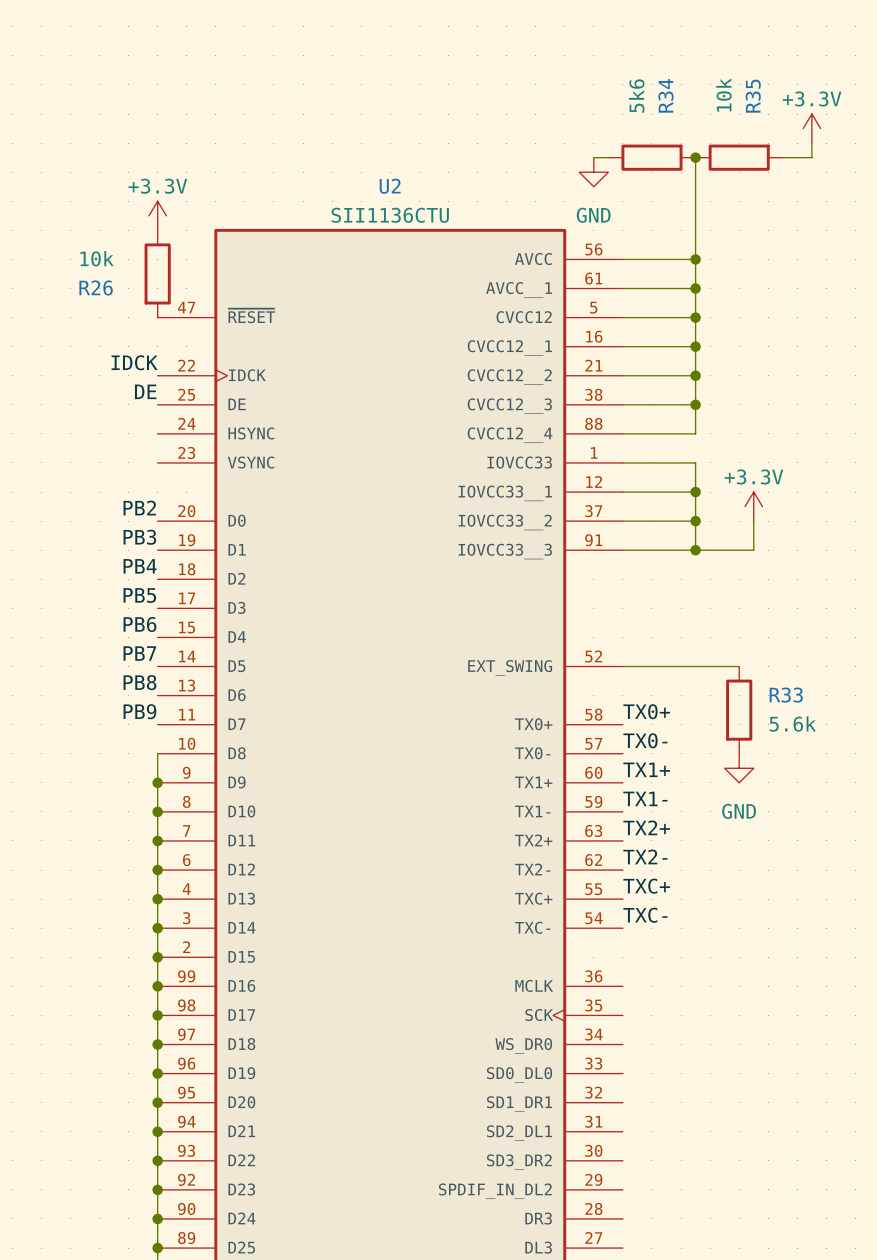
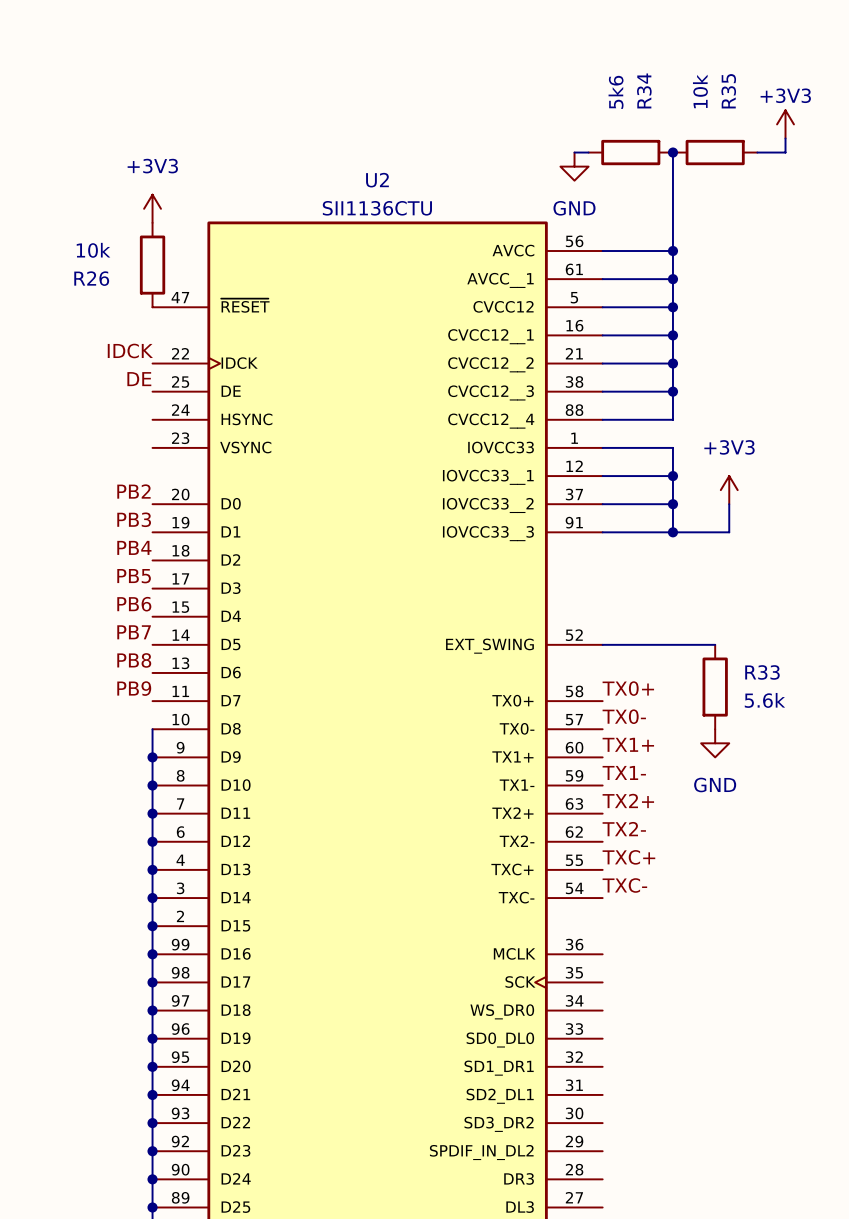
power symbol: +3.3V (811, 128) -> +3V3 (785, 124)
power symbol: +3.3V (157, 215) -> +3V3 (152, 208)
power symbol: +3.3V (753, 506) -> +3V3 (729, 490)

